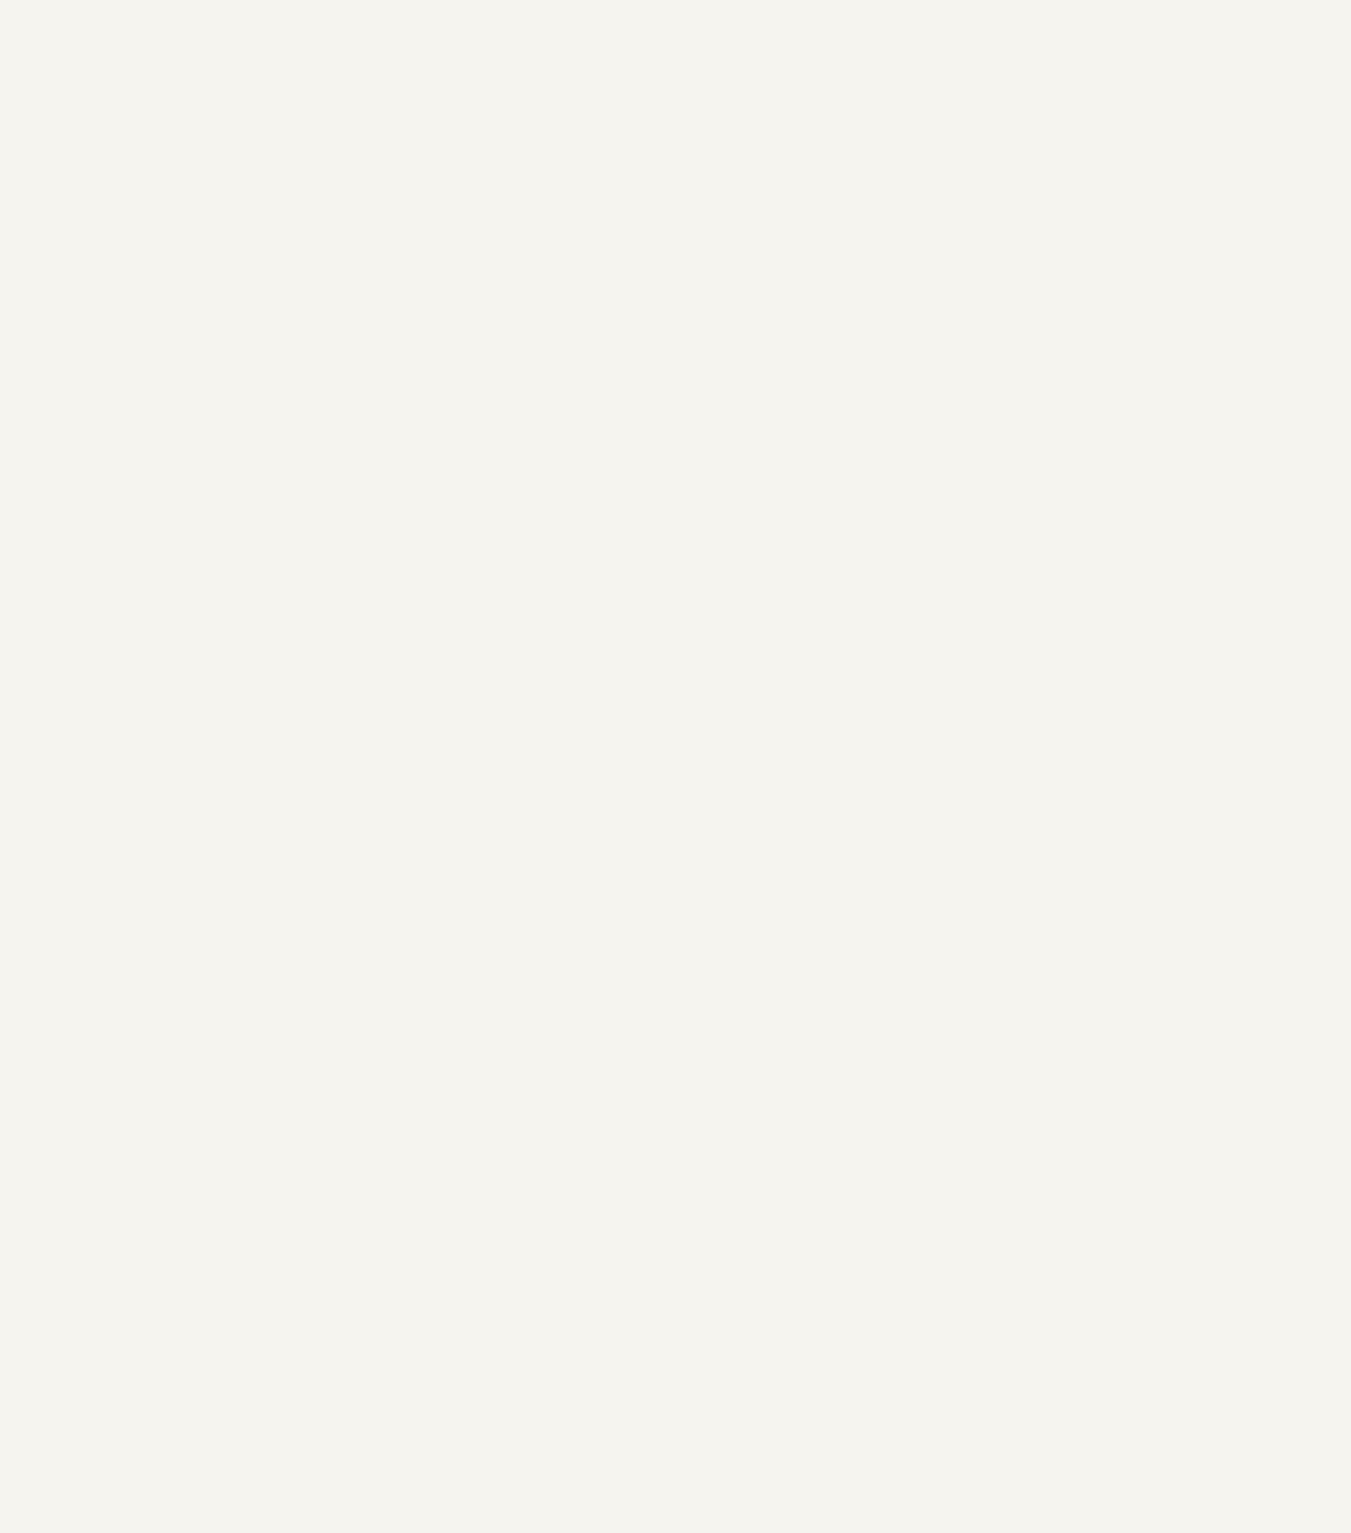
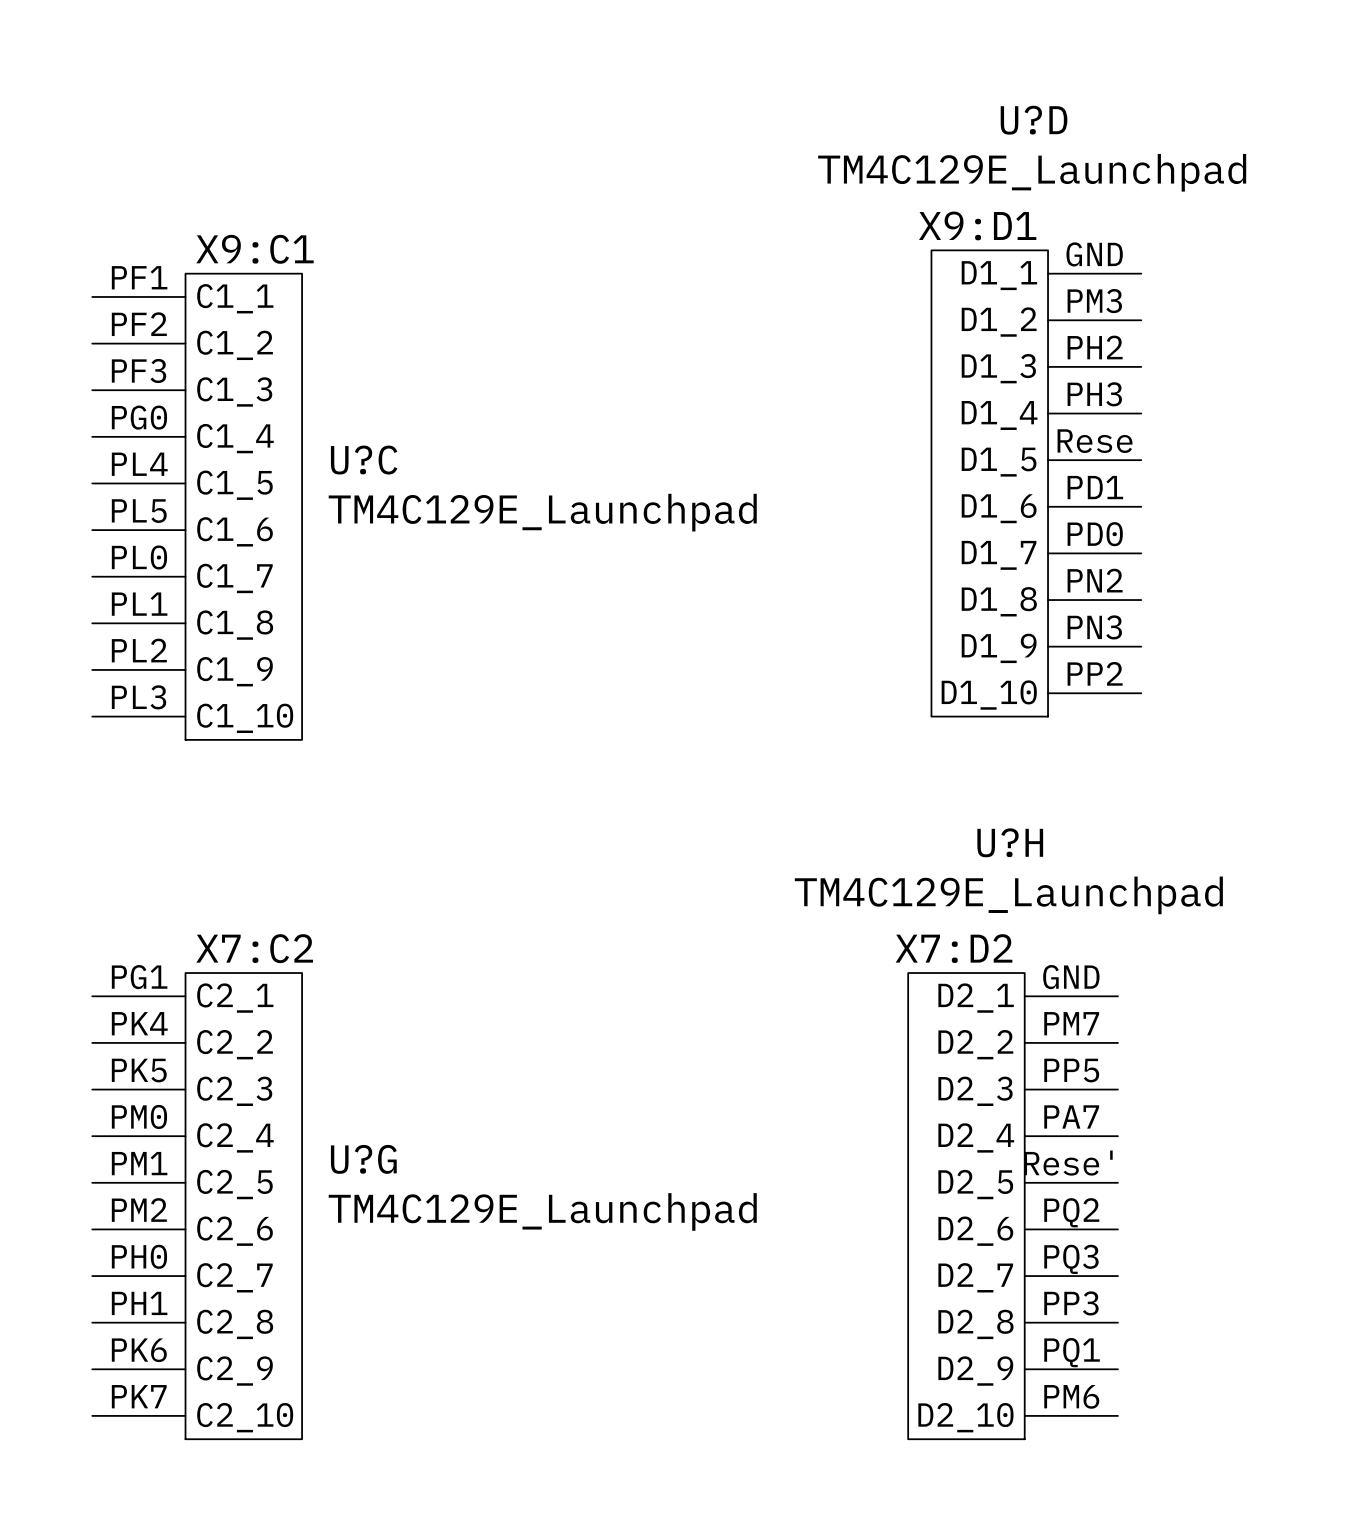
U?D: none -> TM4C129E_Launchpad (1036, 483)
U?C: none -> TM4C129E_Launchpad (197, 506)
U?G: none -> TM4C129E_Launchpad (197, 1206)
U?H: none -> TM4C129E_Launchpad (1013, 1206)

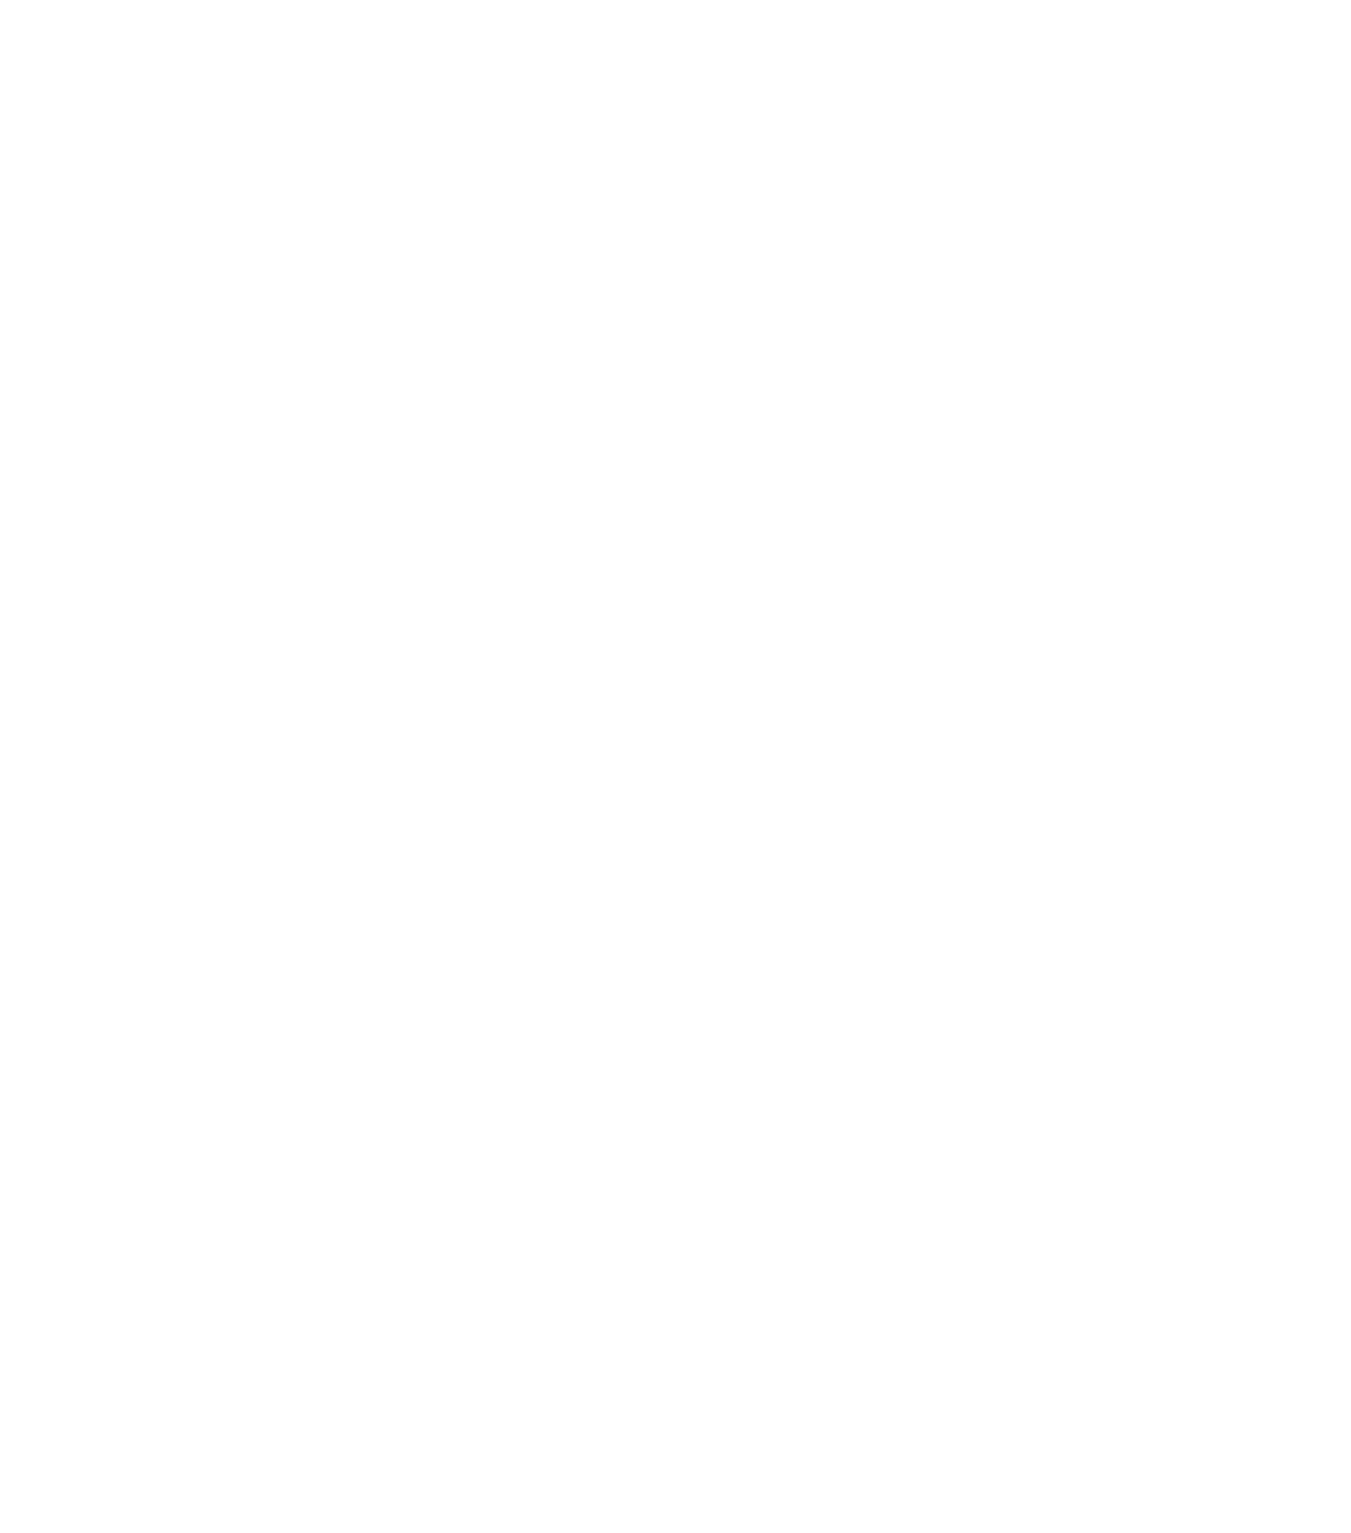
U?D: TM4C129E_Launchpad (1036, 483) -> none
U?C: TM4C129E_Launchpad (197, 506) -> none
U?G: TM4C129E_Launchpad (197, 1206) -> none
U?H: TM4C129E_Launchpad (1013, 1206) -> none

